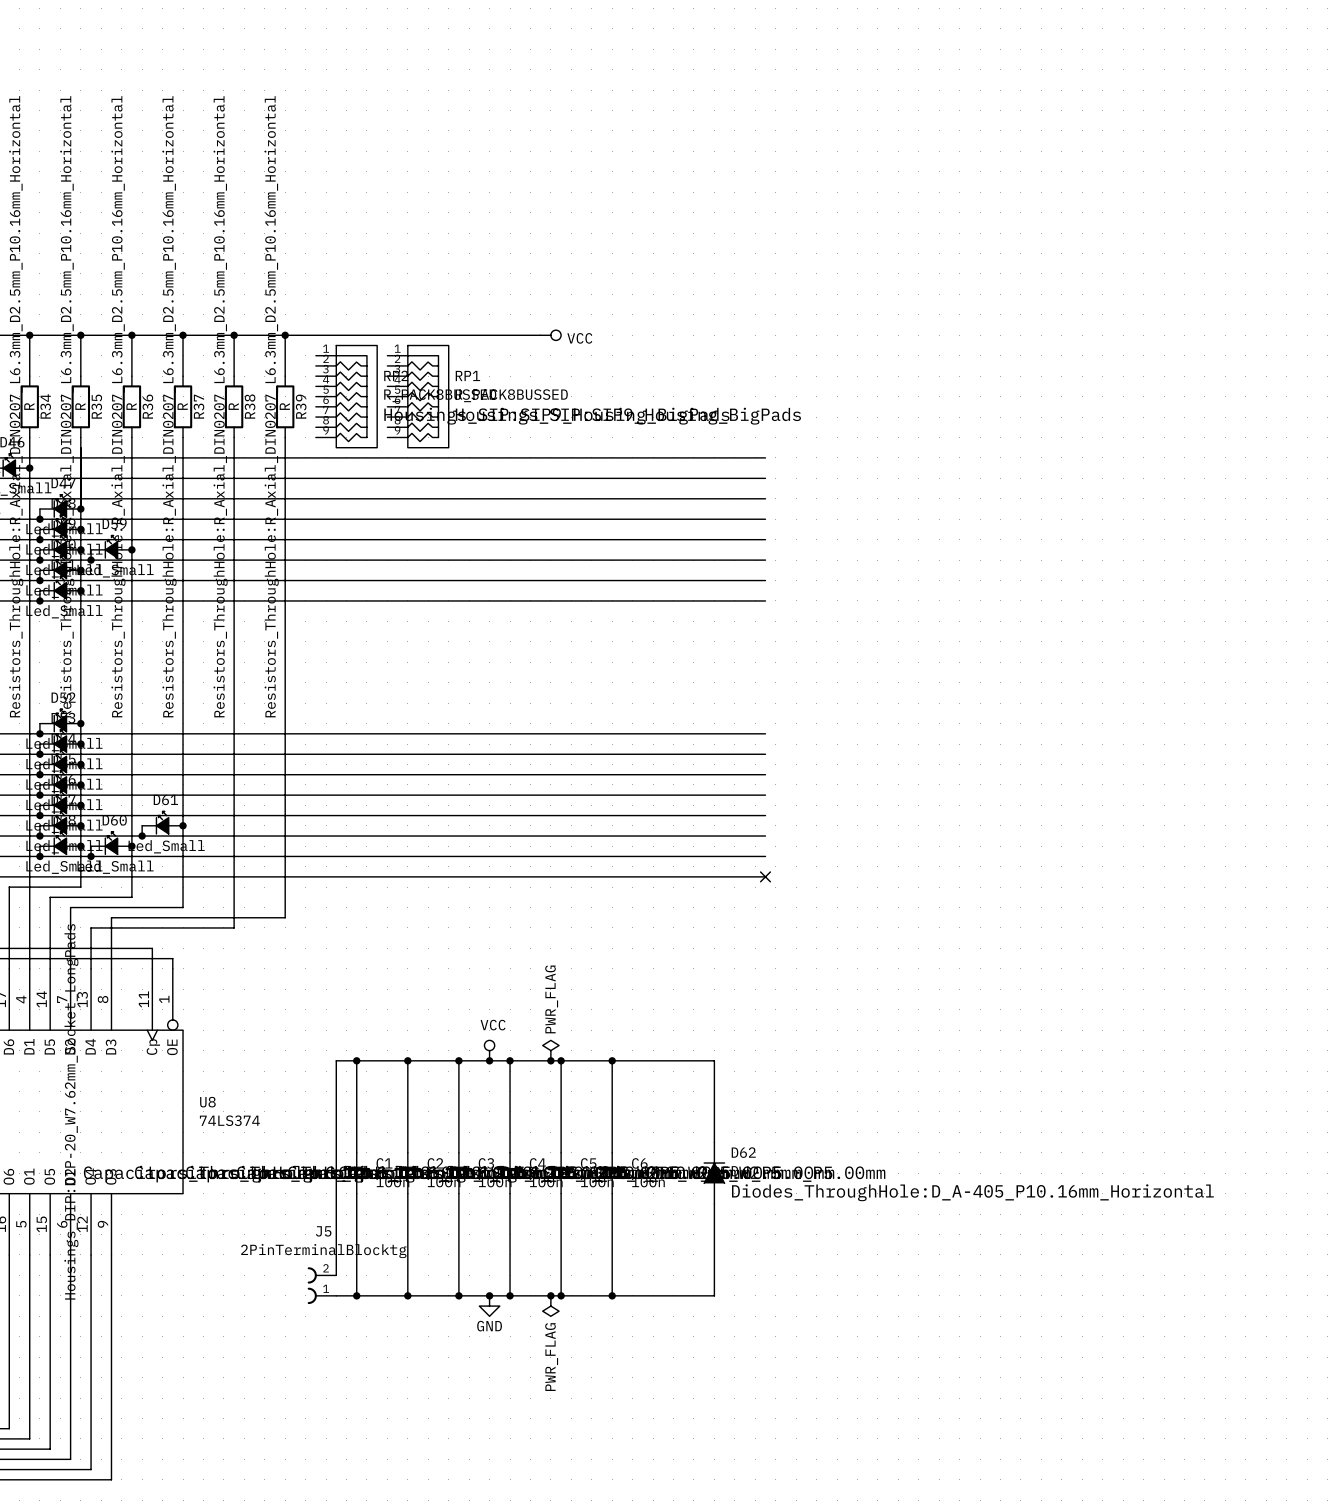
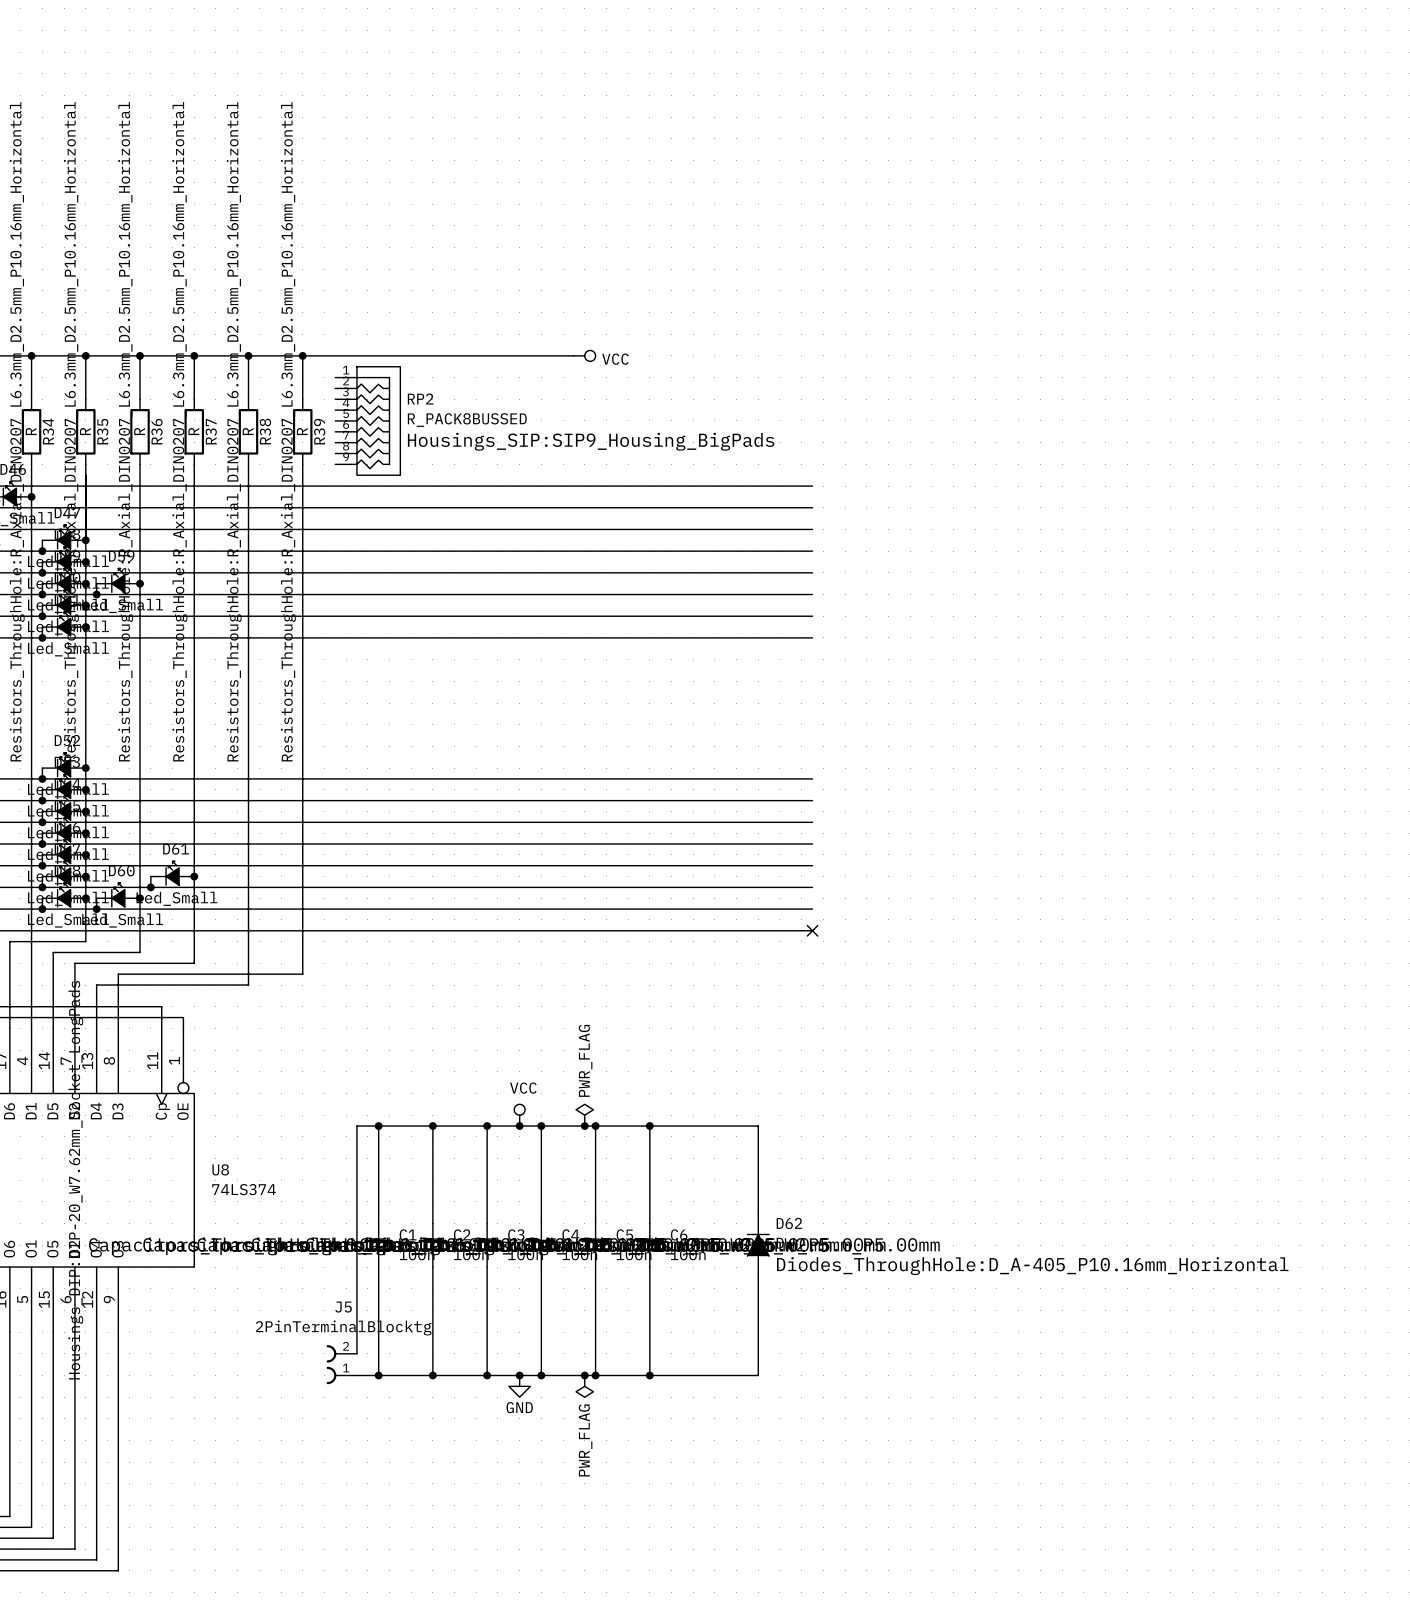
RP1: R_PACK8BUSSED (418, 396) -> none

